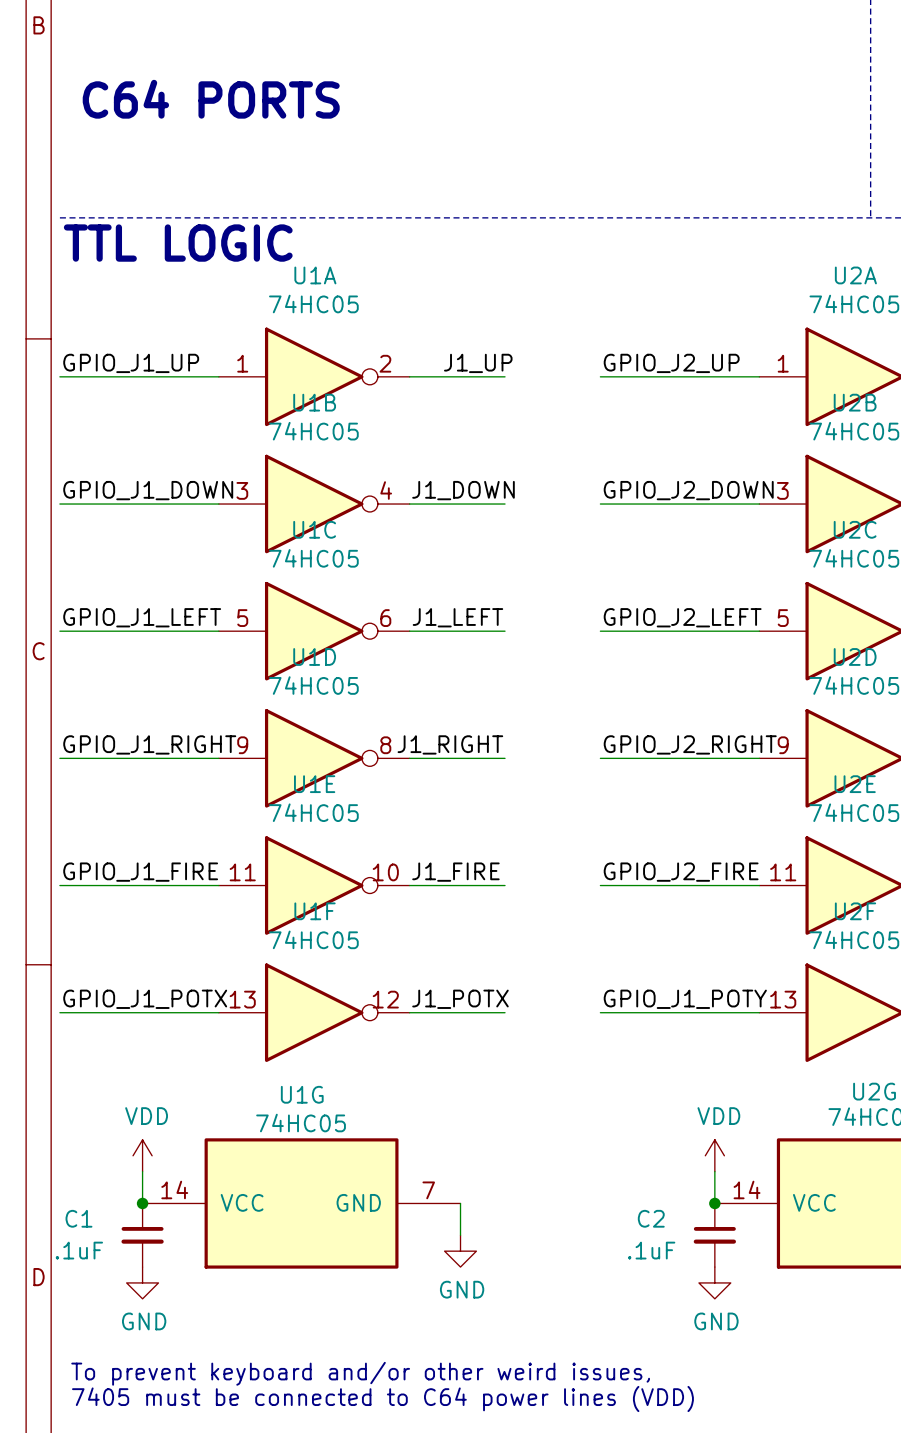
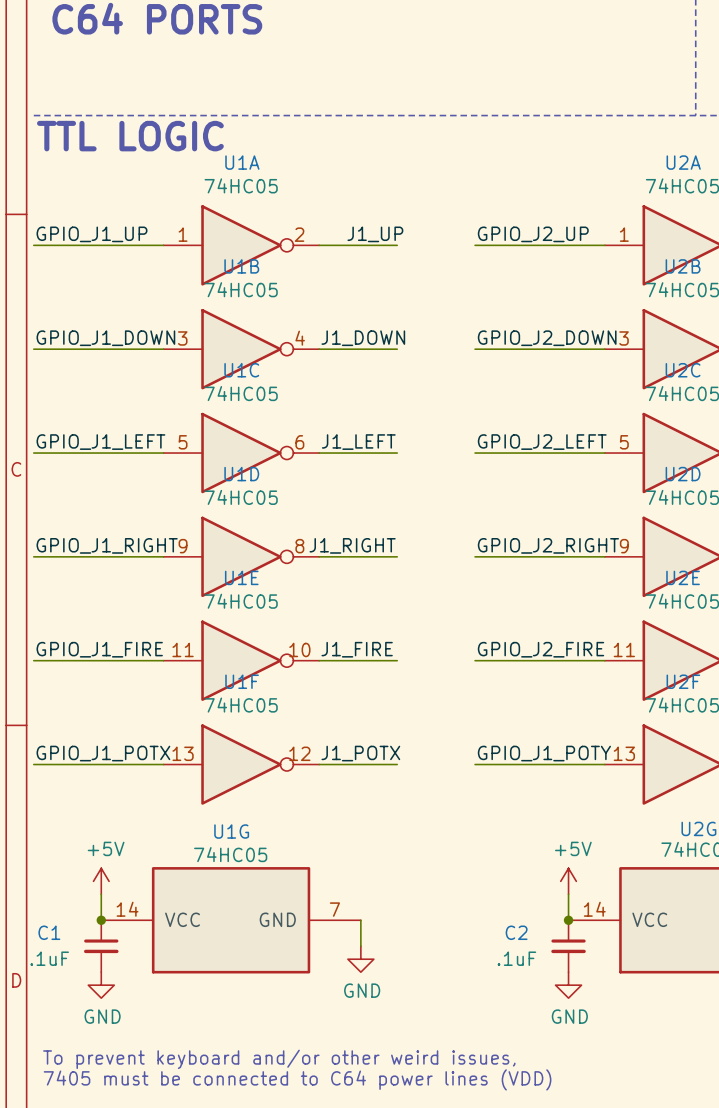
power symbol: VDD (142, 1155) -> +5V (101, 881)
power symbol: VDD (714, 1155) -> +5V (568, 881)

